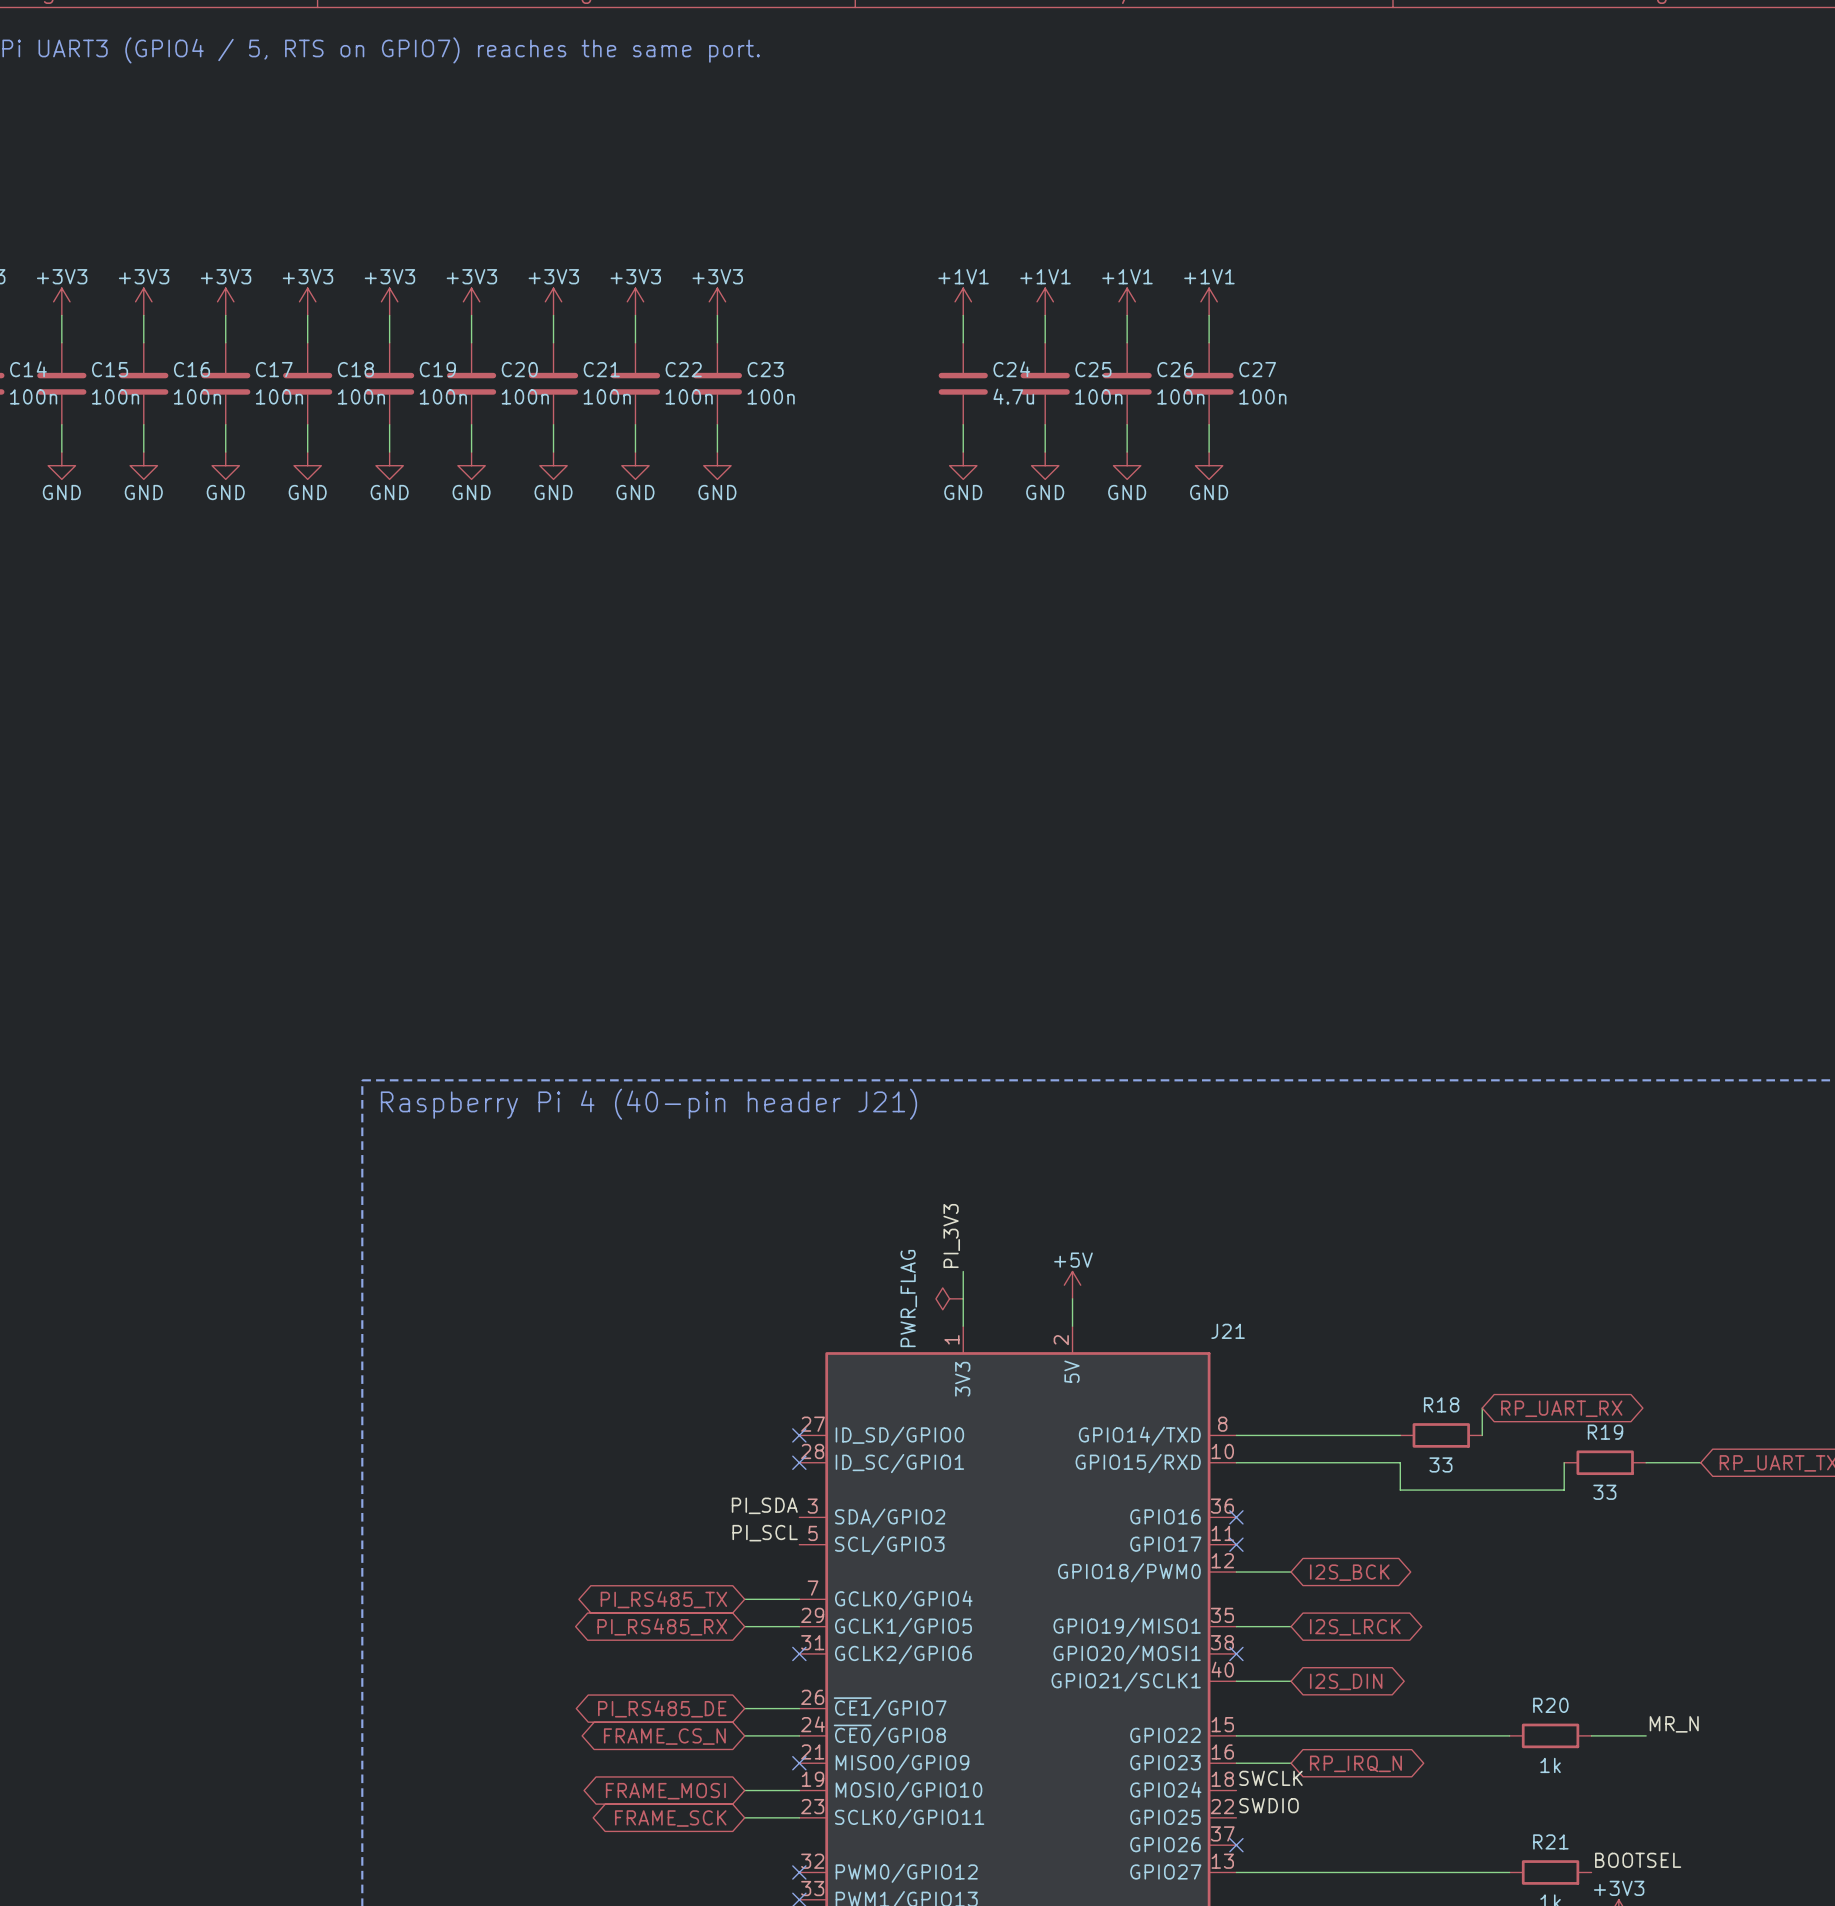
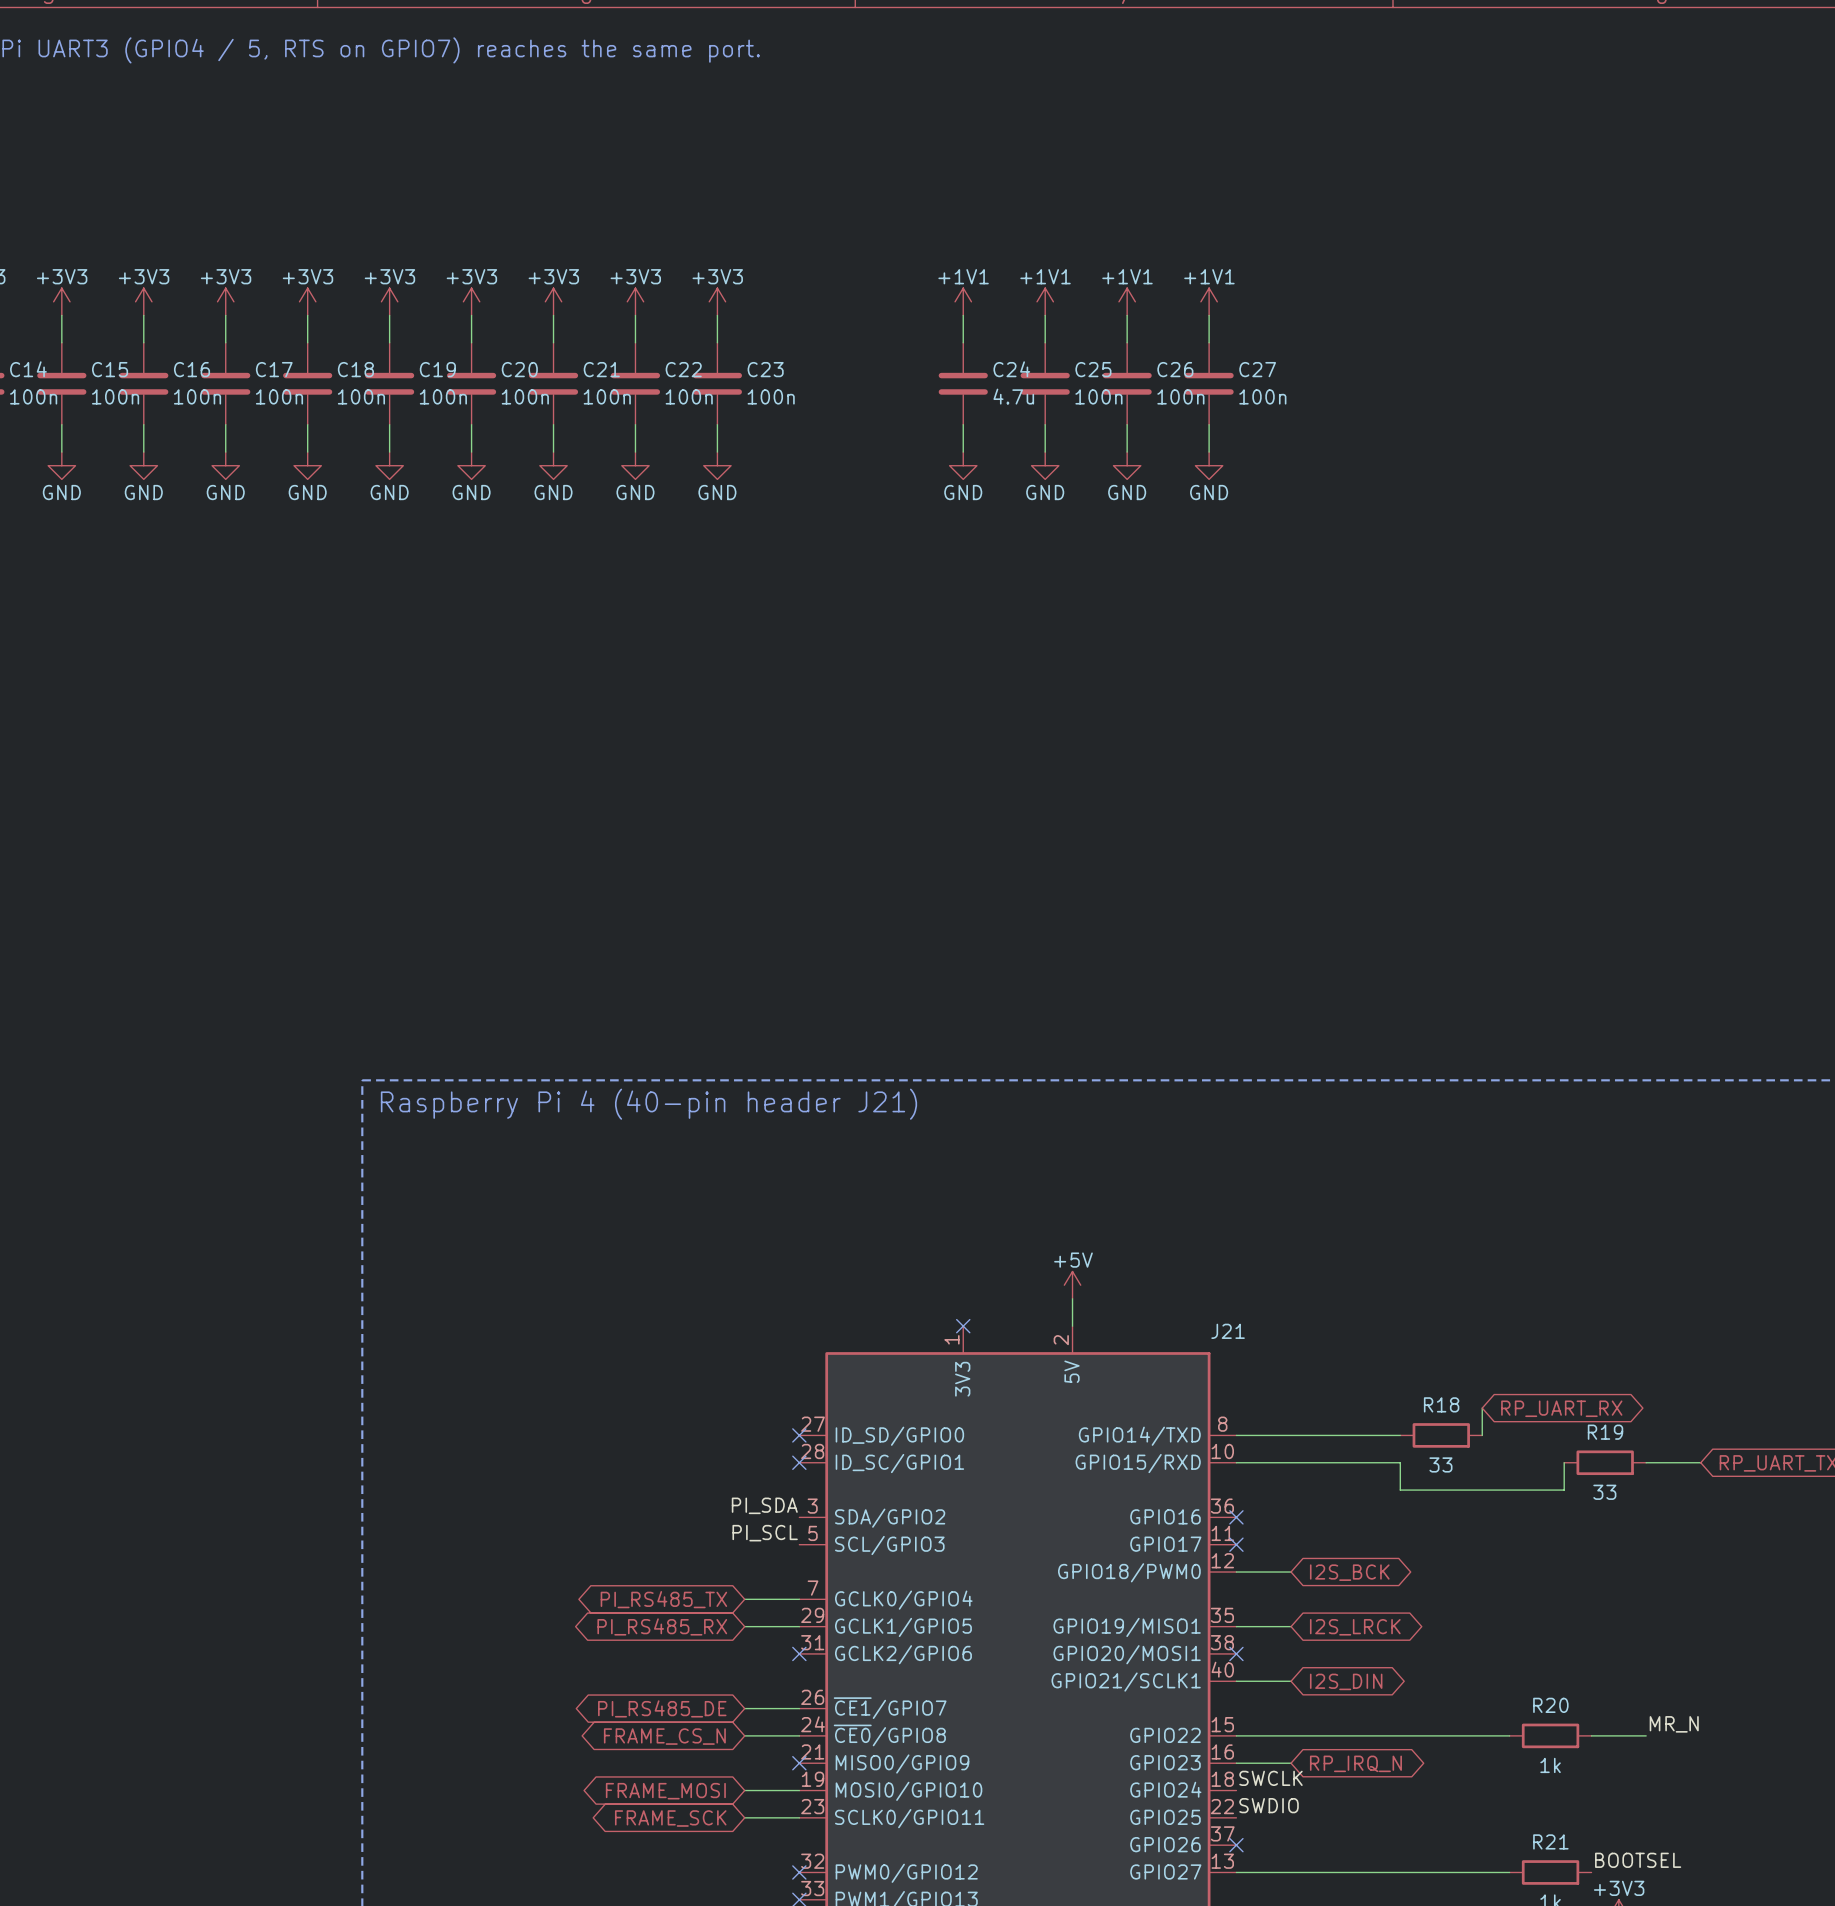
label: PI_3V3 (951, 1235) -> none
wire: (963, 1271) (963, 1326) -> none
power symbol: PWR_FLAG (949, 1298) -> none
no-connect mark: none -> (963, 1326)

